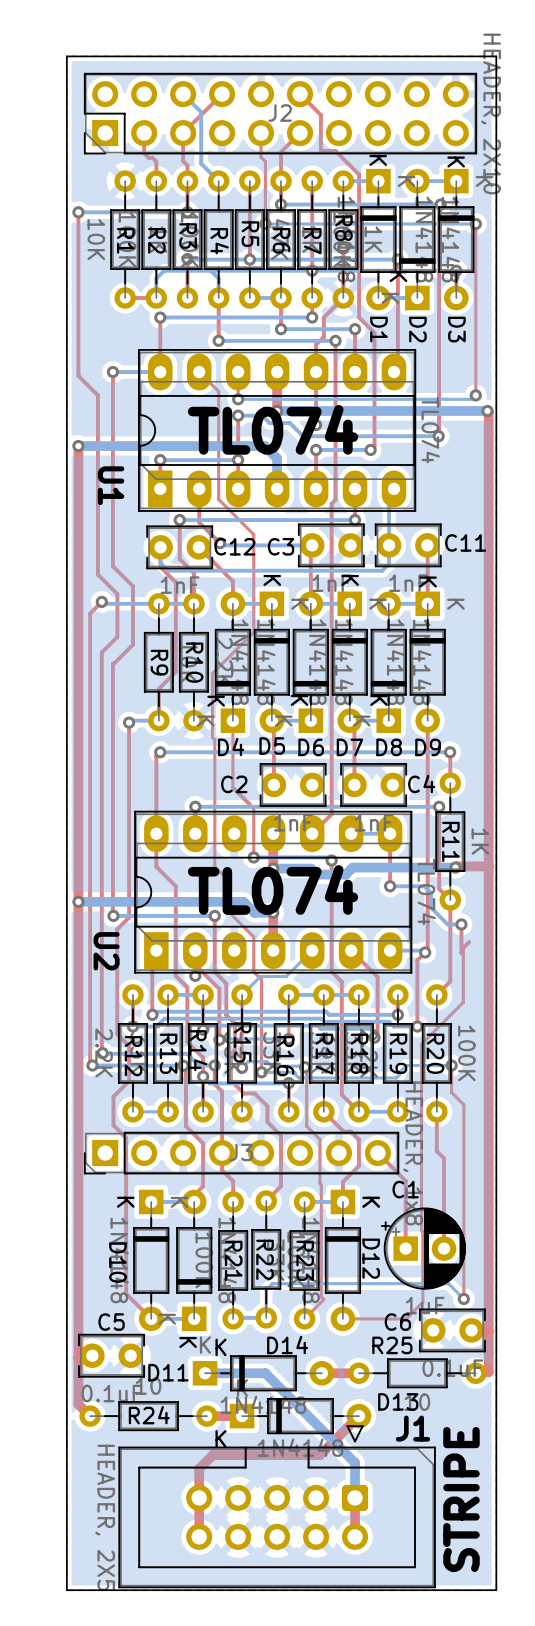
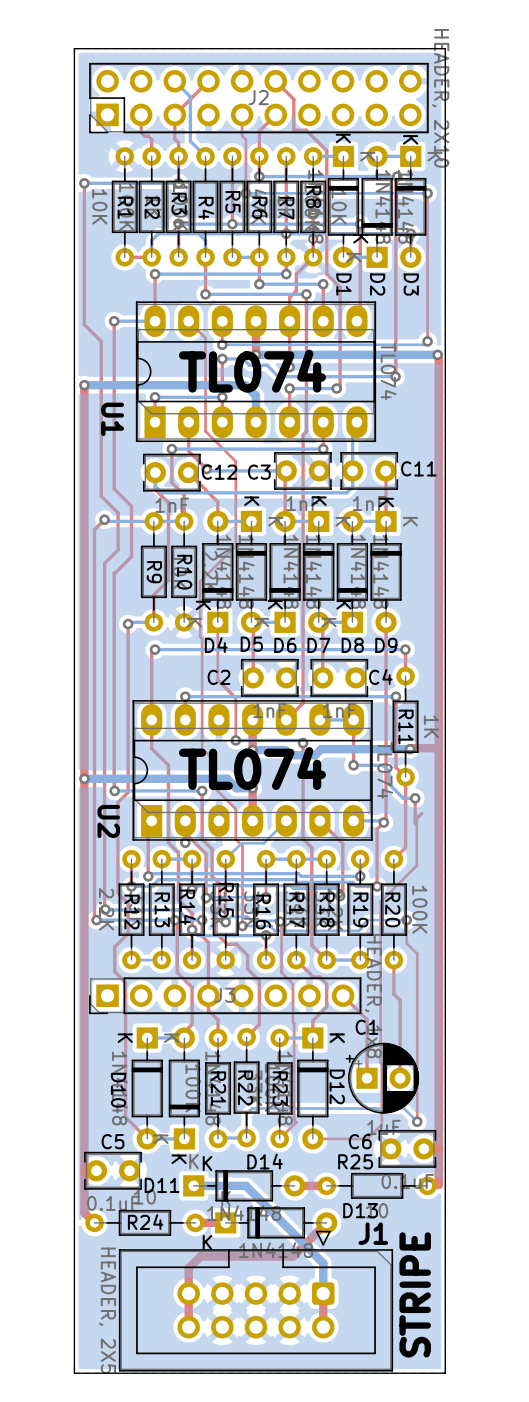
R8 value: 1K (373, 239) -> 10K (339, 206)

